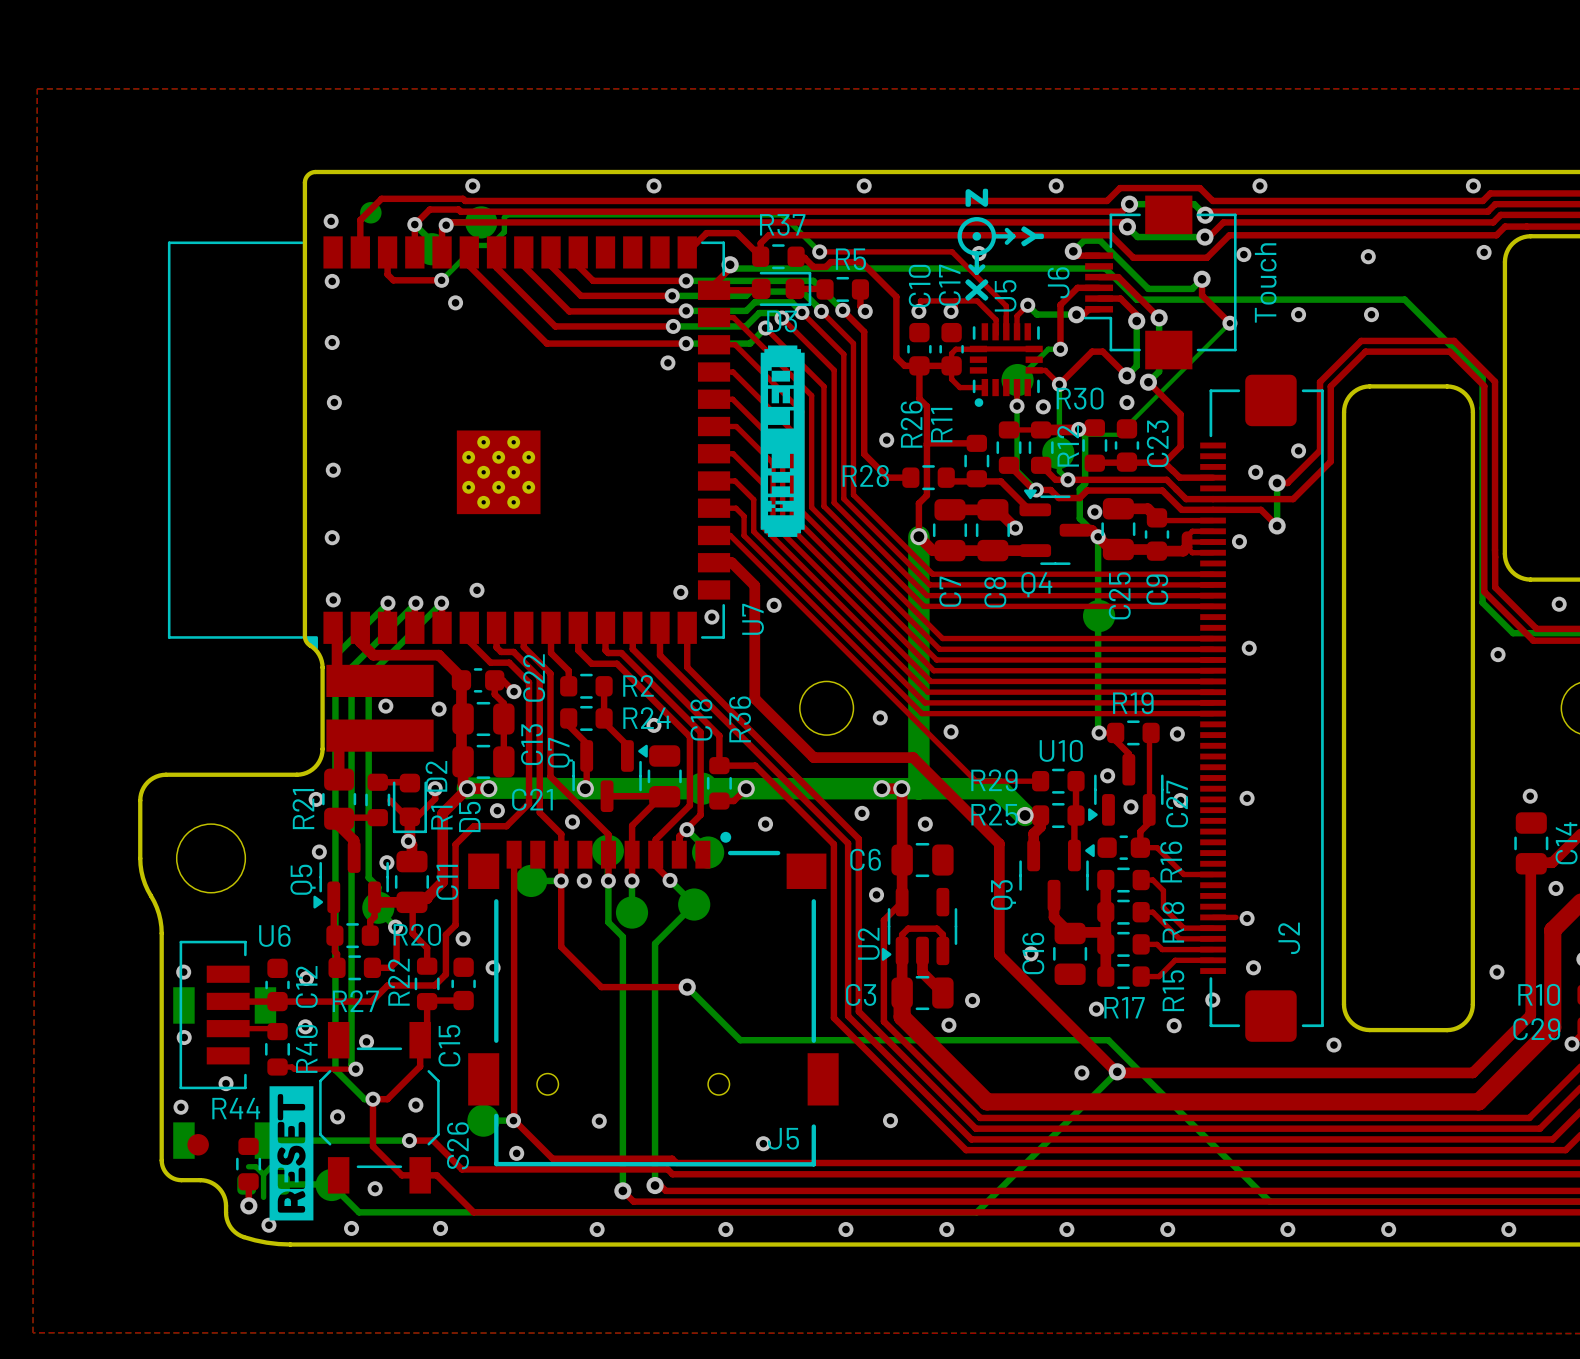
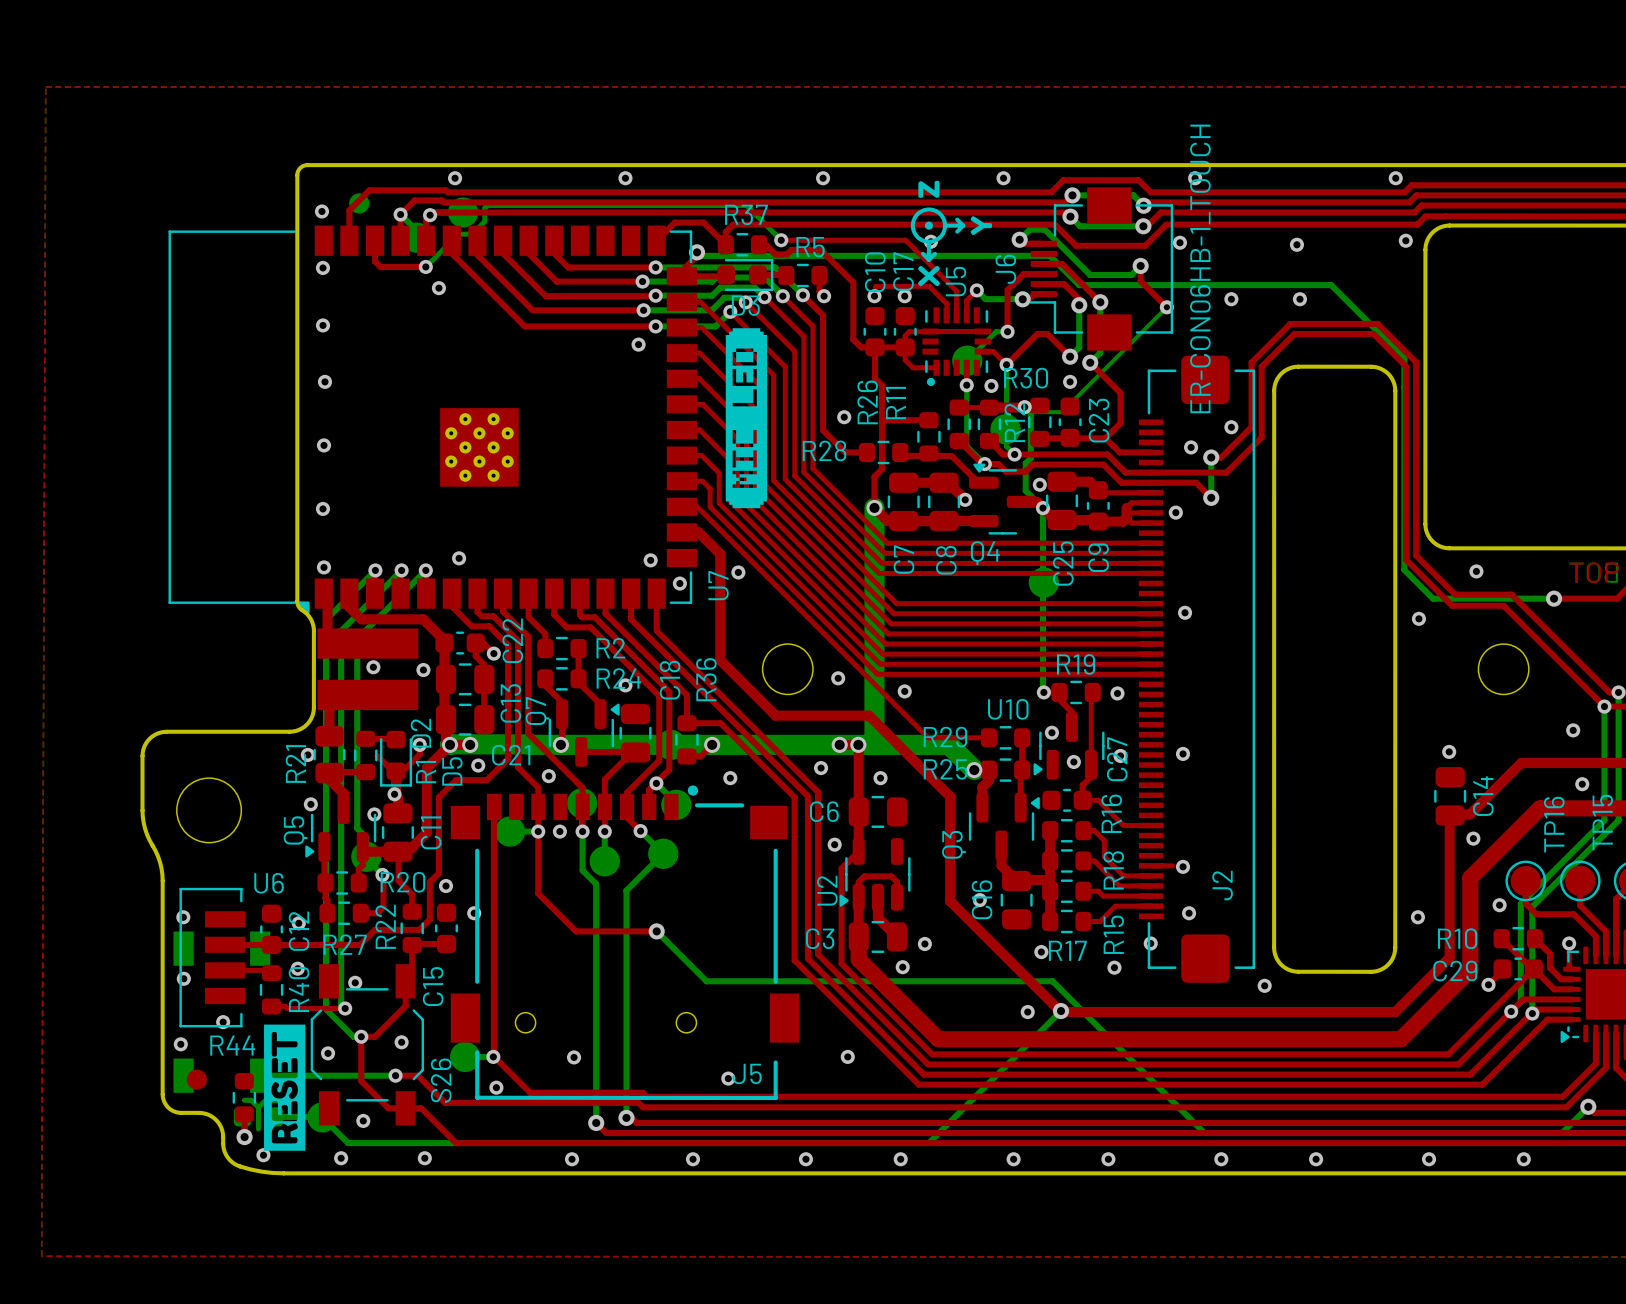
J6 value: Touch (1265, 282) -> ER-CON06HB-1_TOUCH (1200, 268)

